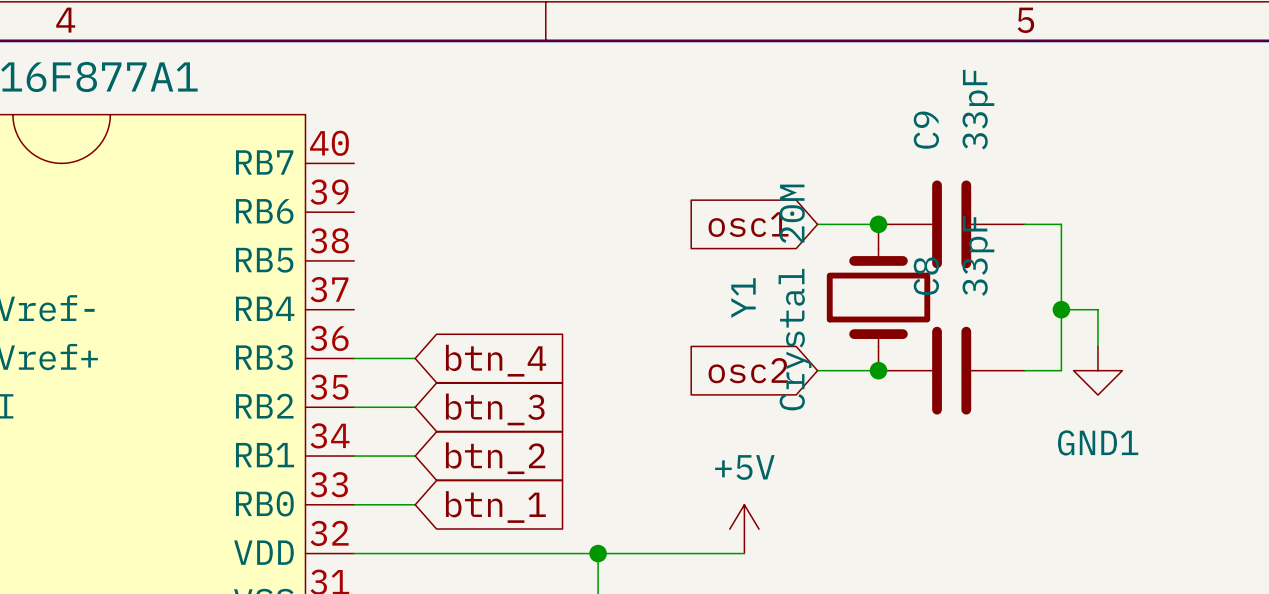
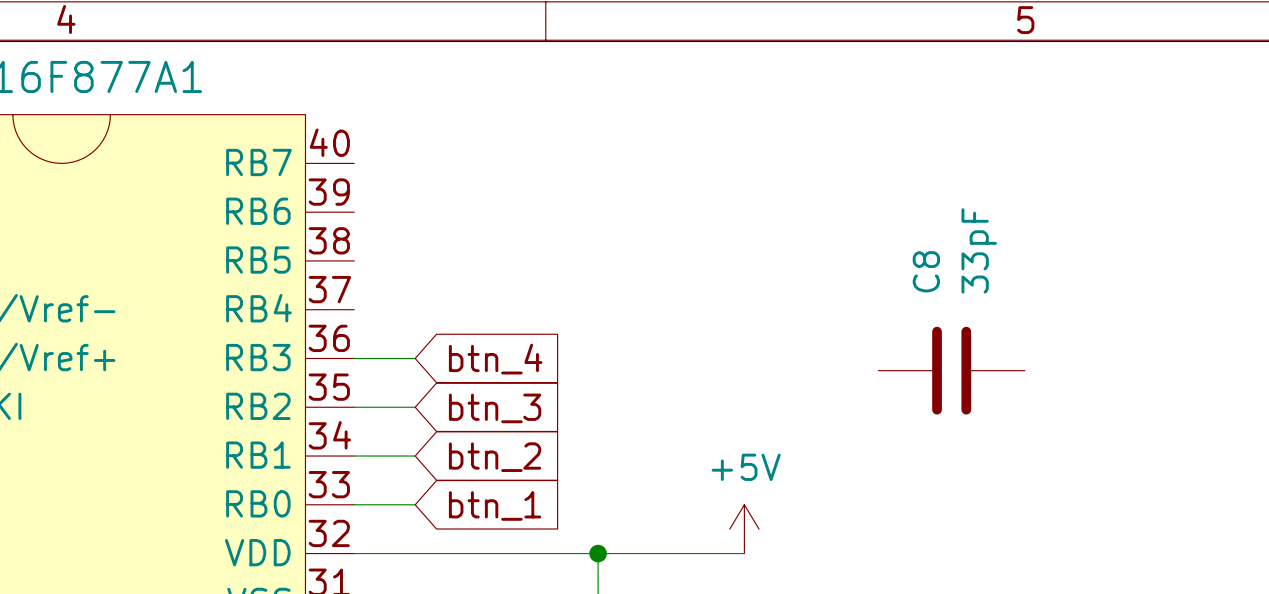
global label: osc1 (748, 224) -> none
wire: (817, 224) (878, 224) -> none
junction: (878, 224) -> none
C9: 33pF (951, 224) -> none
wire: (1024, 224) (1061, 224) (1061, 370) (1024, 370) -> none
Y1: Crystal 20M (878, 297) -> none
wire: (1061, 309) (1097, 309) (1097, 346) -> none
junction: (1061, 309) -> none
global label: osc2 (748, 370) -> none
wire: (817, 370) (878, 370) -> none
junction: (878, 370) -> none
power symbol: GND1 (1097, 370) -> none

